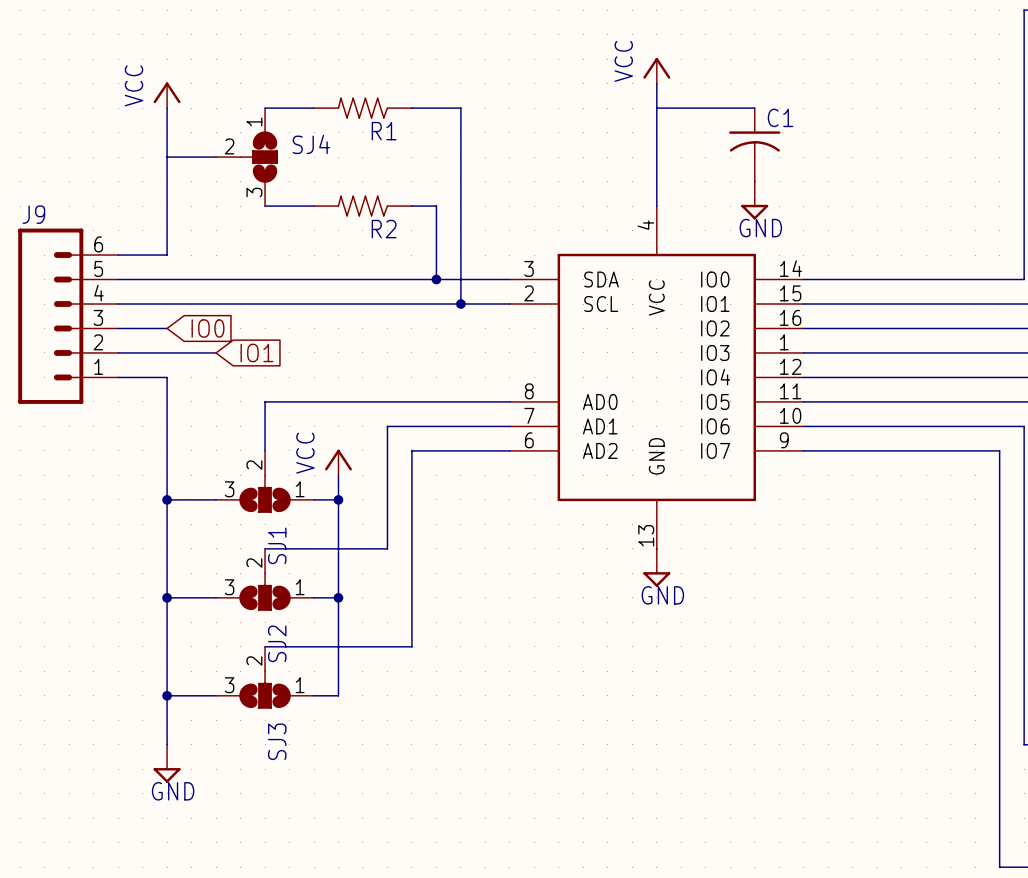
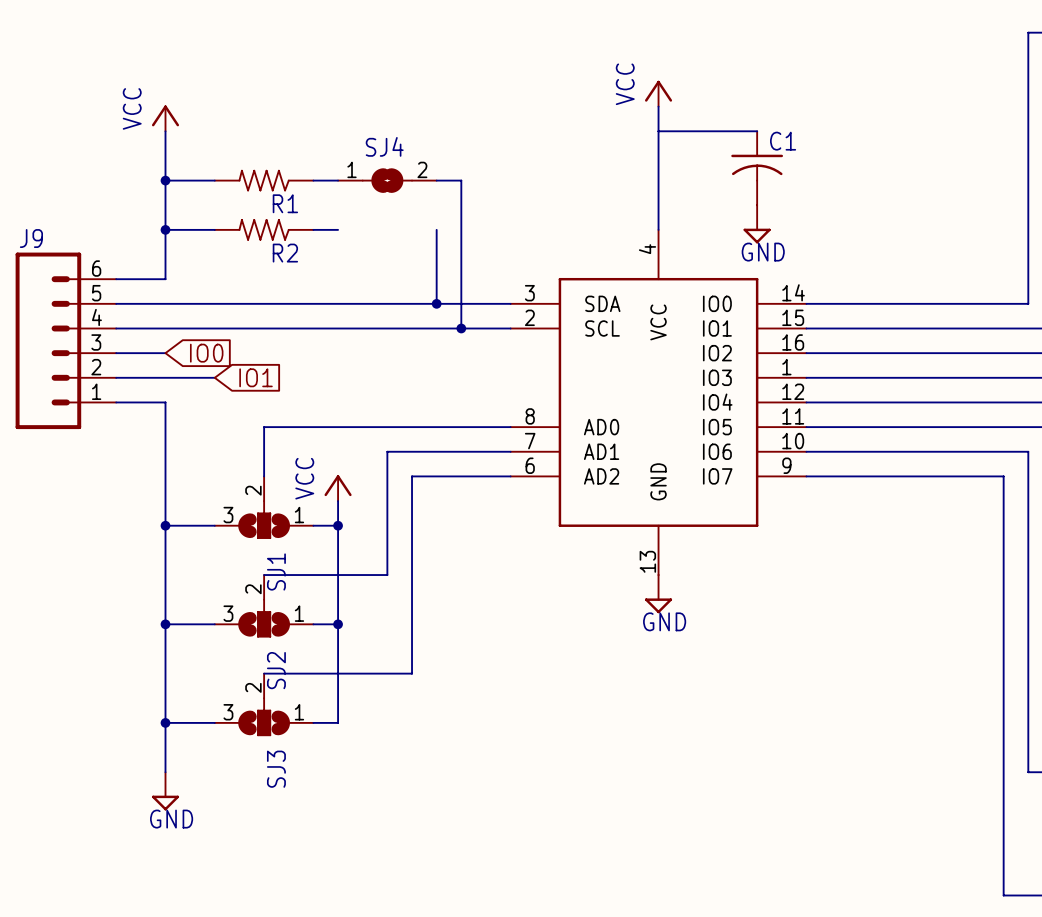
SJ4 symbol: [216, 108, 279, 207] -> [338, 168, 437, 193]
wire: (265, 108) (314, 108) -> (165, 229) (214, 229)
R1 position: (362, 108) -> (264, 180)
wire: (411, 108) (460, 108) (460, 157) -> (436, 180) (461, 180)
SJ4 name position: SJ4 (311, 144) -> SJ4 (384, 146)
junction: none -> (165, 180)
junction: none -> (165, 229)
R2 position: (362, 206) -> (264, 229)
wire: (411, 206) (436, 206) -> (313, 180) (338, 180)

